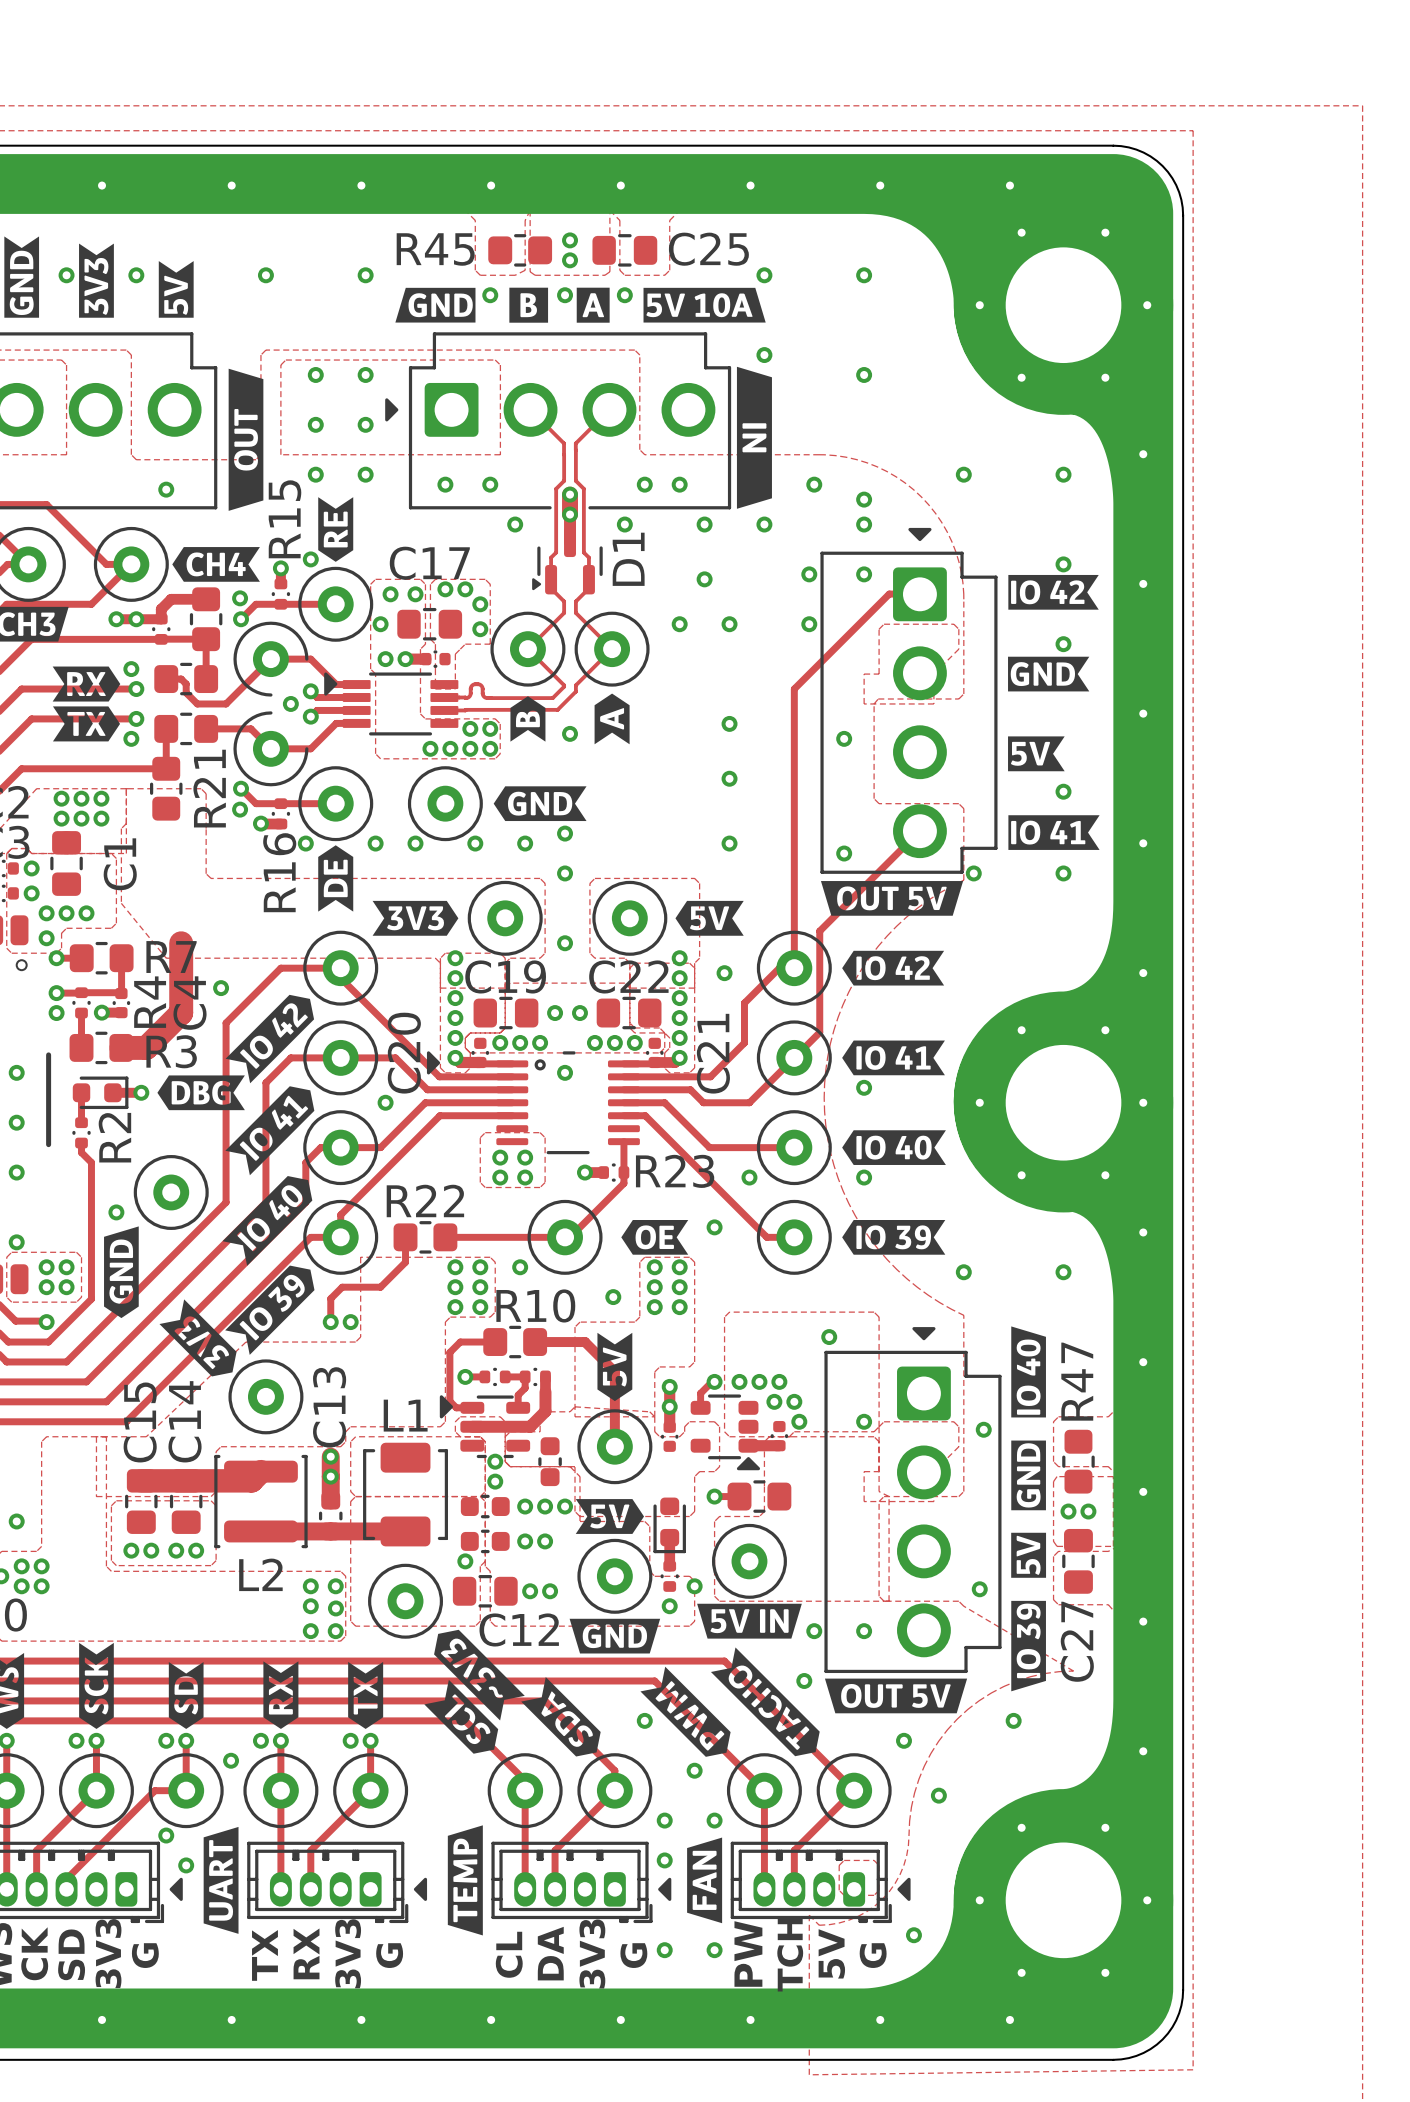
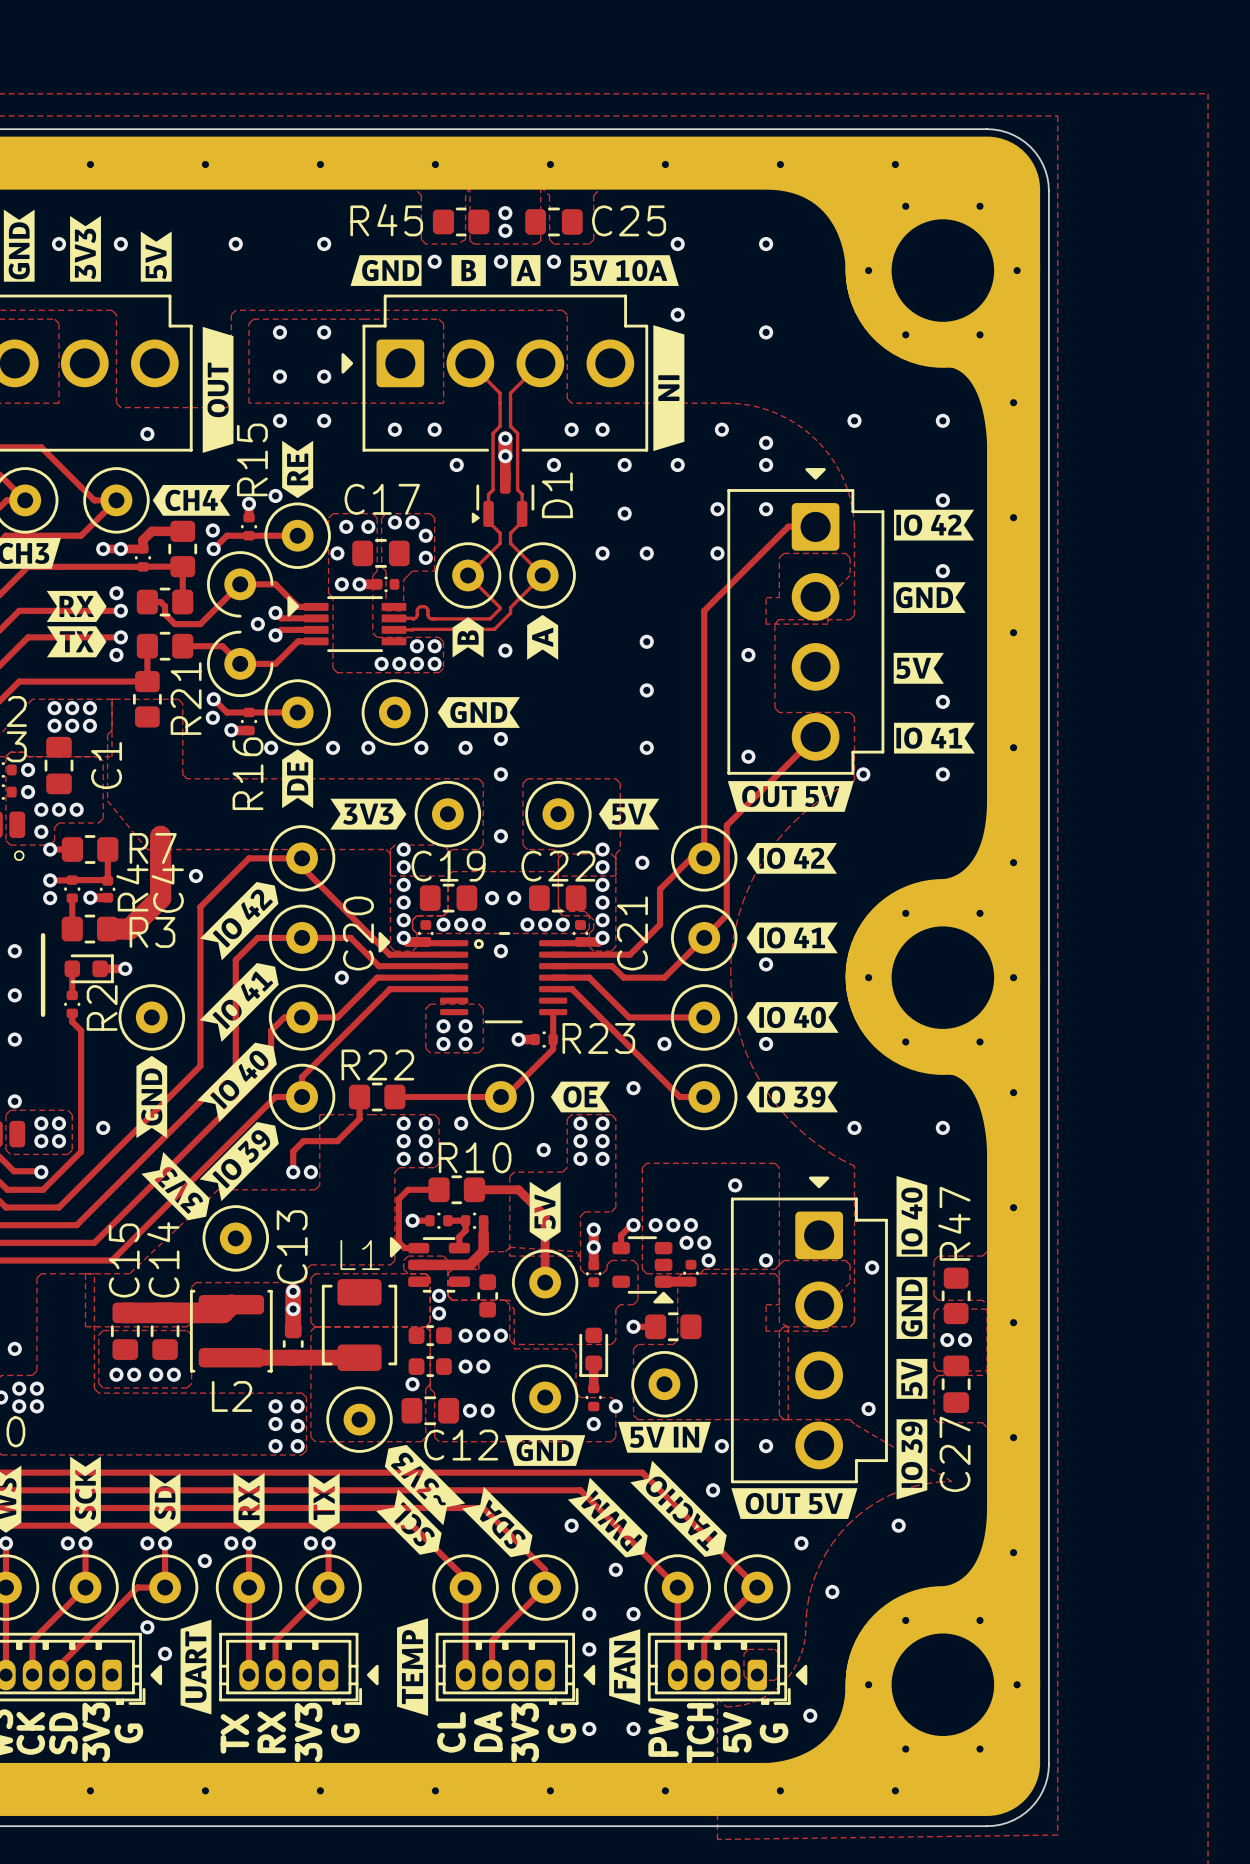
drawing: [157, 1075, 245, 1111] -> none
drawing: none -> [136, 1055, 168, 1139]
part position: (171, 1192) -> (151, 1017)
via position: (116, 1212) -> (103, 1127)
drawing: [104, 1226, 139, 1319] -> none
drawing: [575, 1499, 645, 1534] -> none

